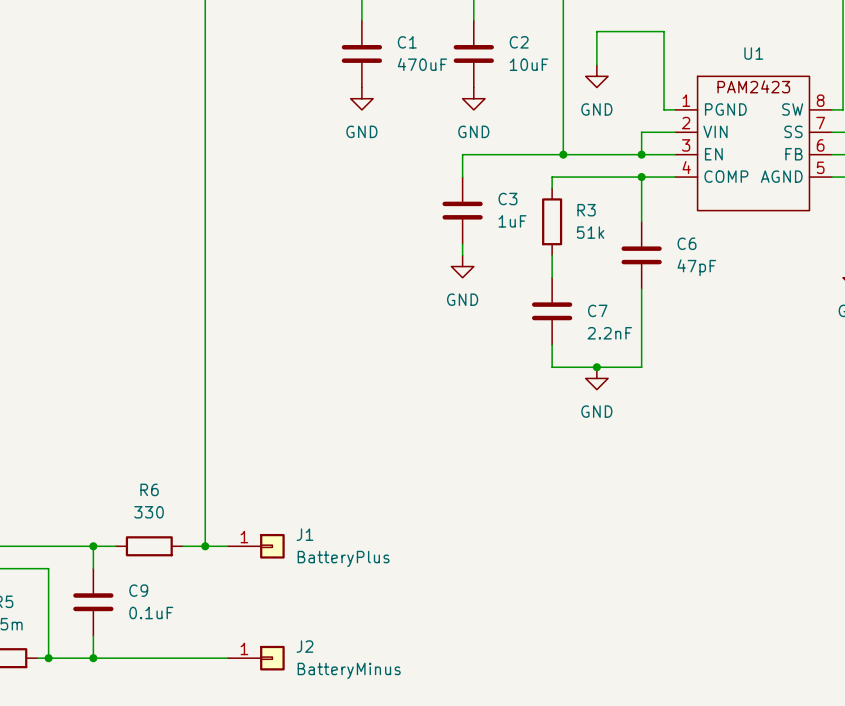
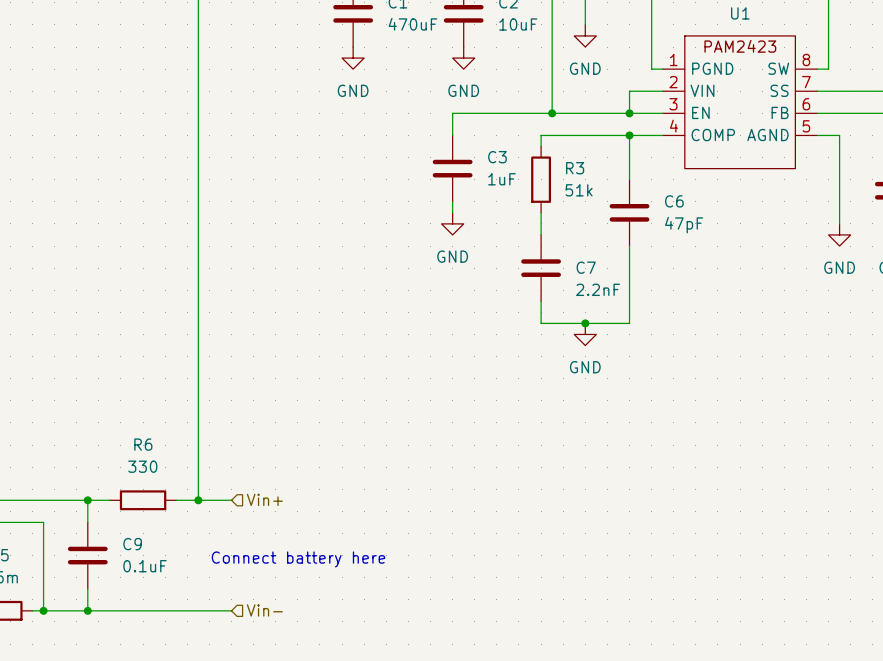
hierarchical label: none -> Vin+ (264, 499)
J1: BatteryPlus (256, 546) -> none
text: none -> Connect battery here (298, 559)
hierarchical label: none -> Vin- (264, 610)
J2: BatteryMinus (256, 658) -> none

